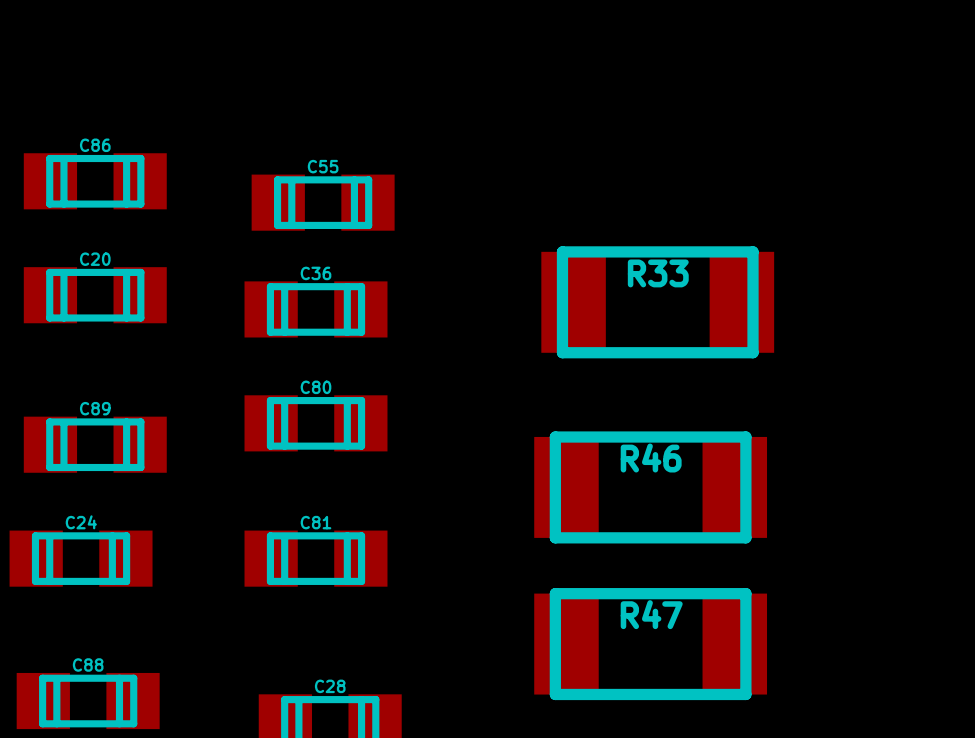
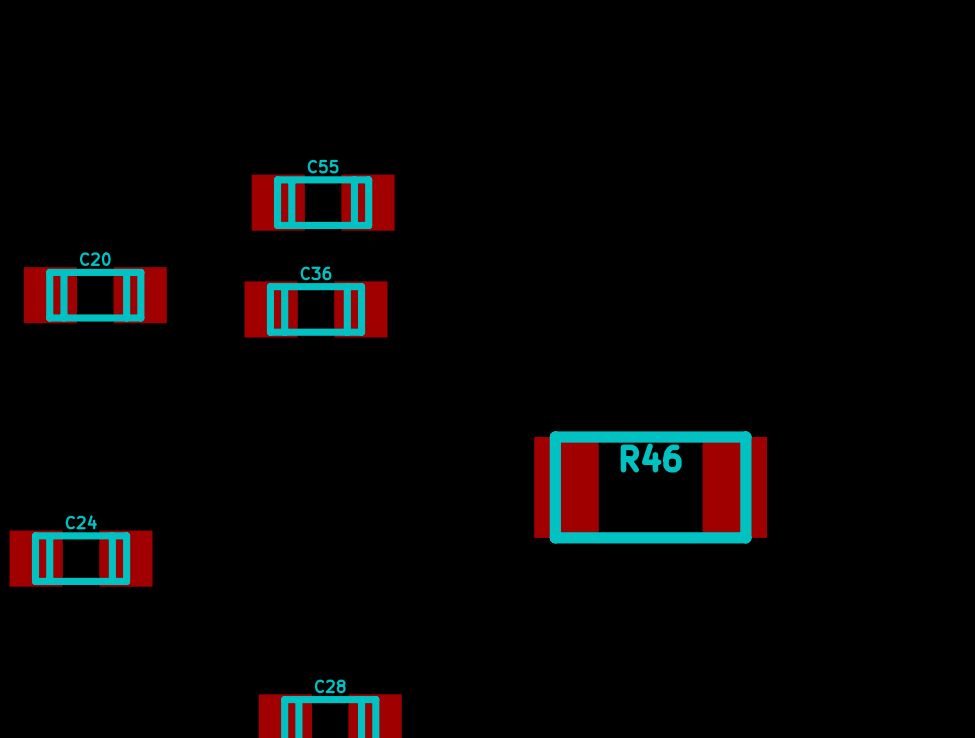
C86: (95, 181) -> none
R33: (657, 302) -> none
C80: (316, 423) -> none
C89: (95, 444) -> none
C81: (316, 558) -> none
R47: (650, 644) -> none
C88: (88, 701) -> none

